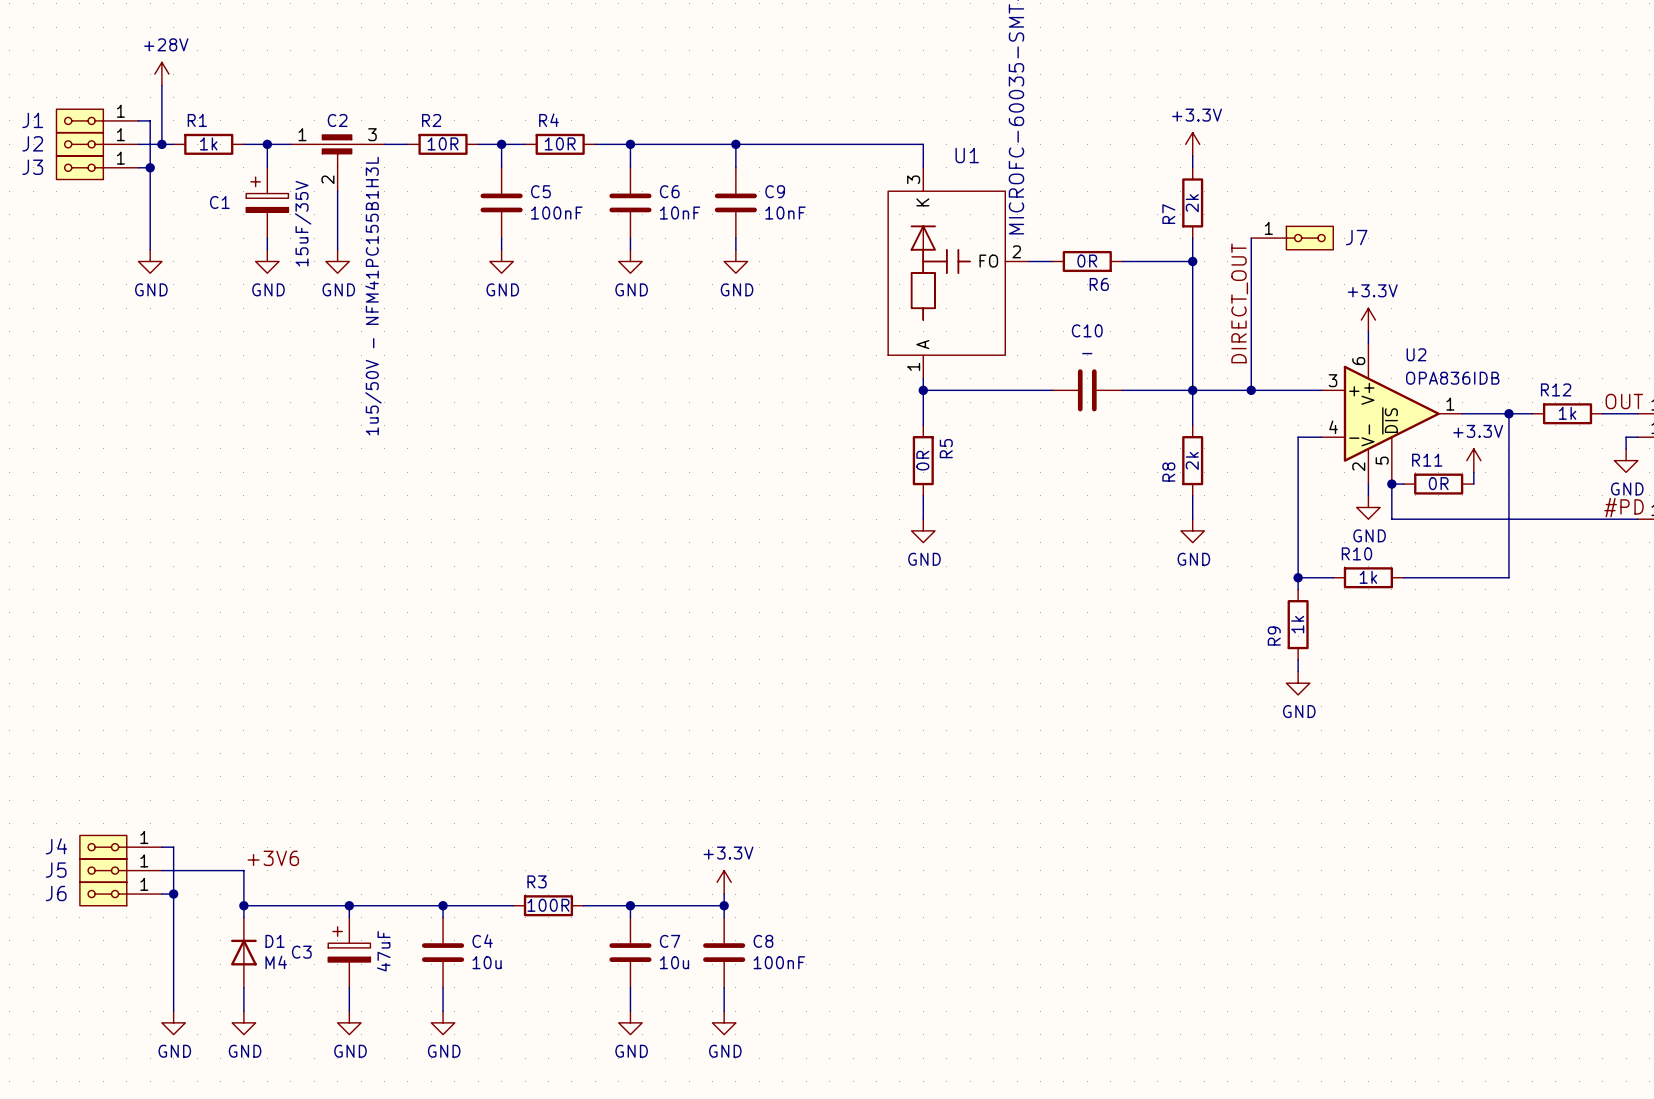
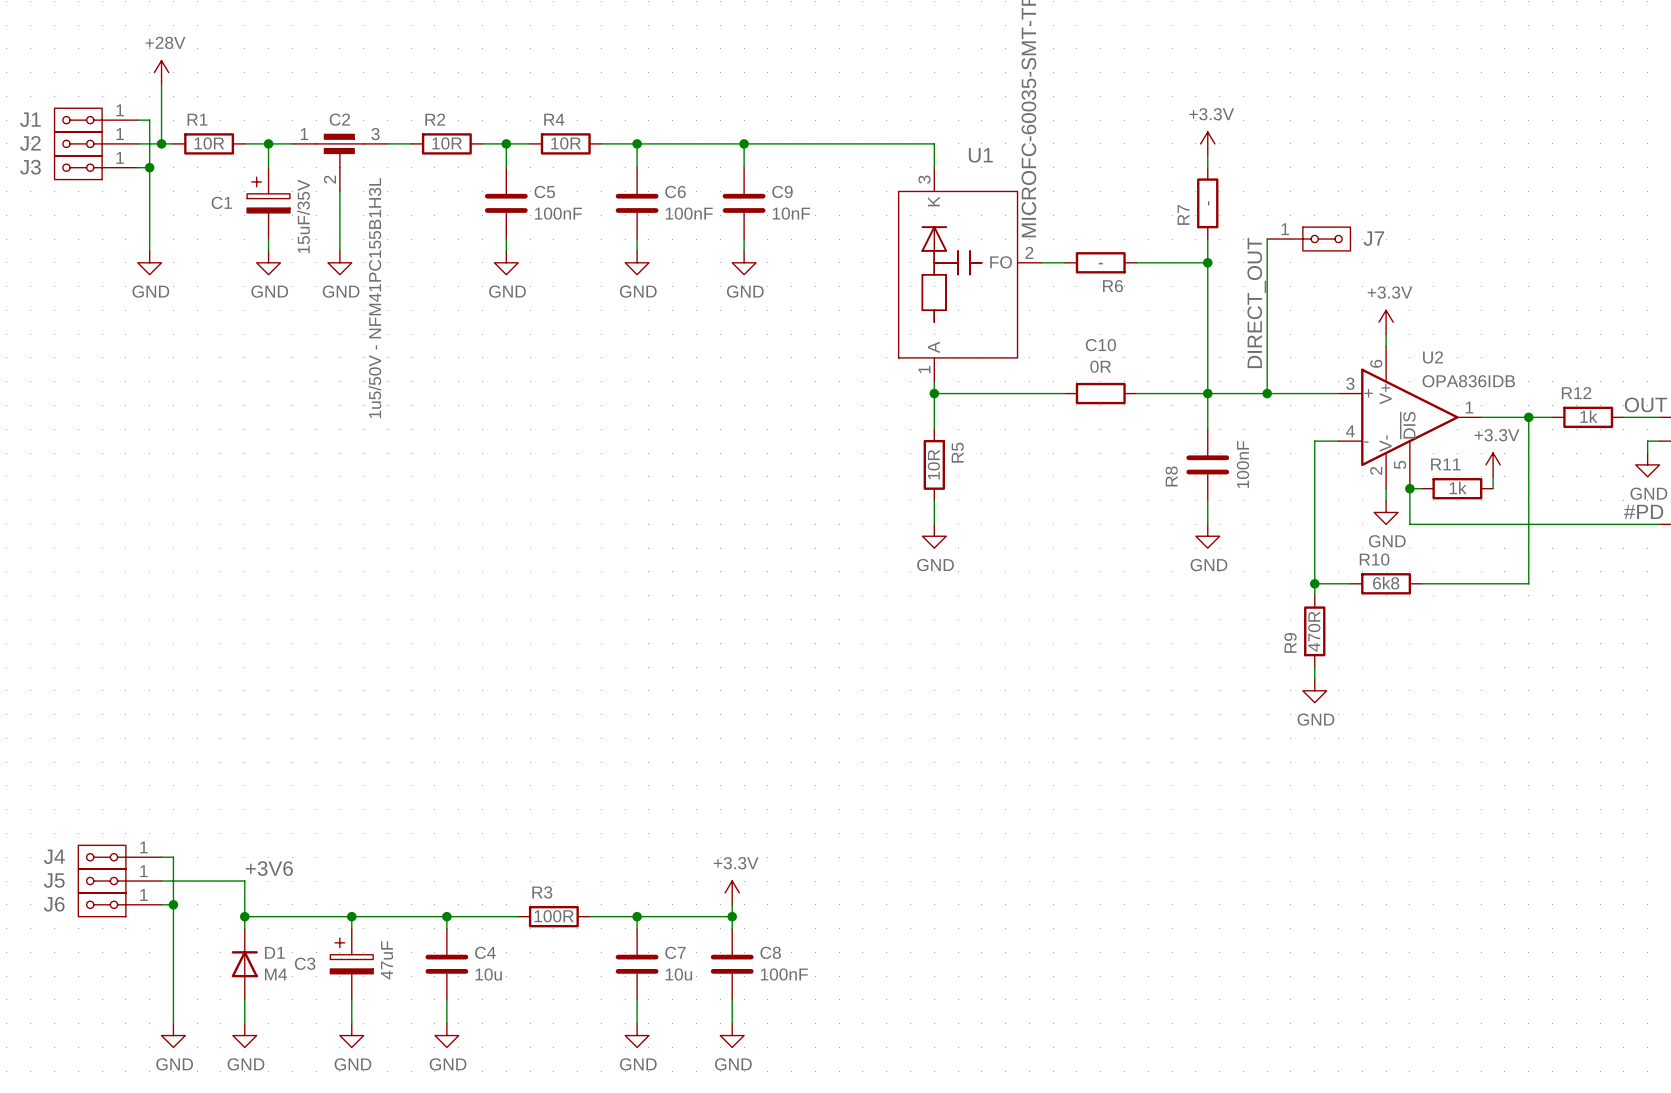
R1 value: 1k (208, 143) -> 10R (209, 143)
R7 value: 2k (1192, 203) -> - (1208, 203)
C6 value: 10nF (680, 213) -> 100nF (689, 213)
R6 value: 0R (1087, 261) -> - (1100, 263)
C10 value: - (1087, 353) -> 0R (1100, 366)
C10 symbol: [1052, 369, 1123, 412] -> [1065, 382, 1137, 405]
R8 symbol: [1182, 425, 1204, 496] -> [1186, 429, 1230, 501]
R5 value: 0R (922, 460) -> 10R (933, 464)
R8 value: 2k (1192, 460) -> 100nF (1242, 464)
R11 value: 0R (1438, 483) -> 1k (1458, 487)
R10 value: 1k (1368, 577) -> 6k8 (1386, 583)
R9 value: 1k (1297, 624) -> 470R (1314, 631)

